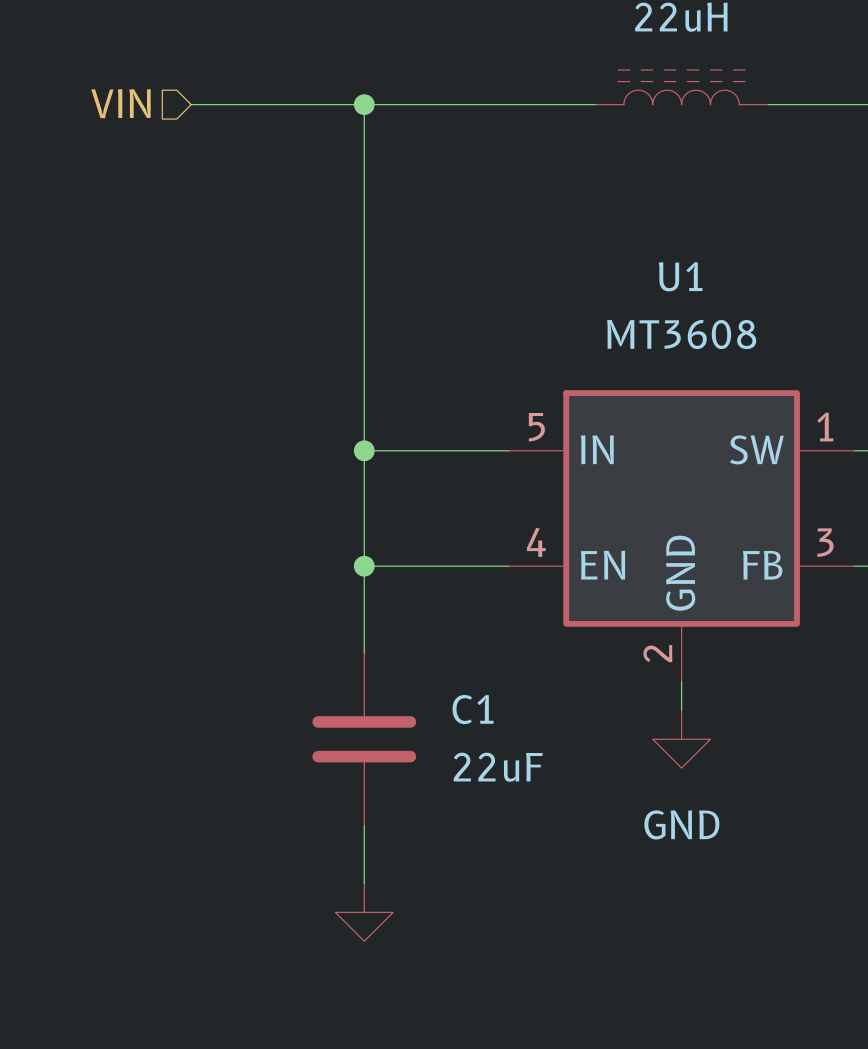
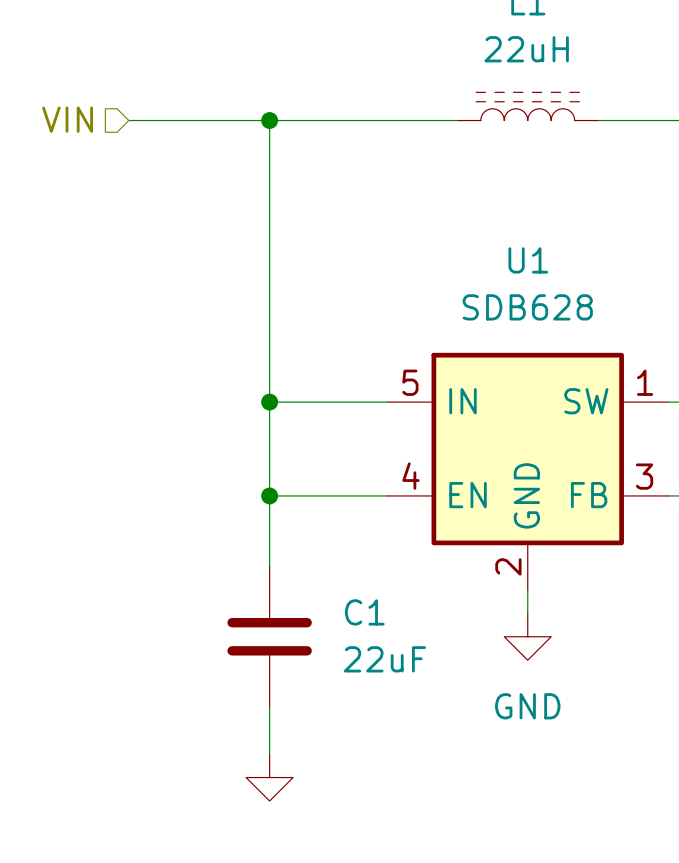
U1 value: MT3608 (681, 334) -> SDB628 (527, 307)

